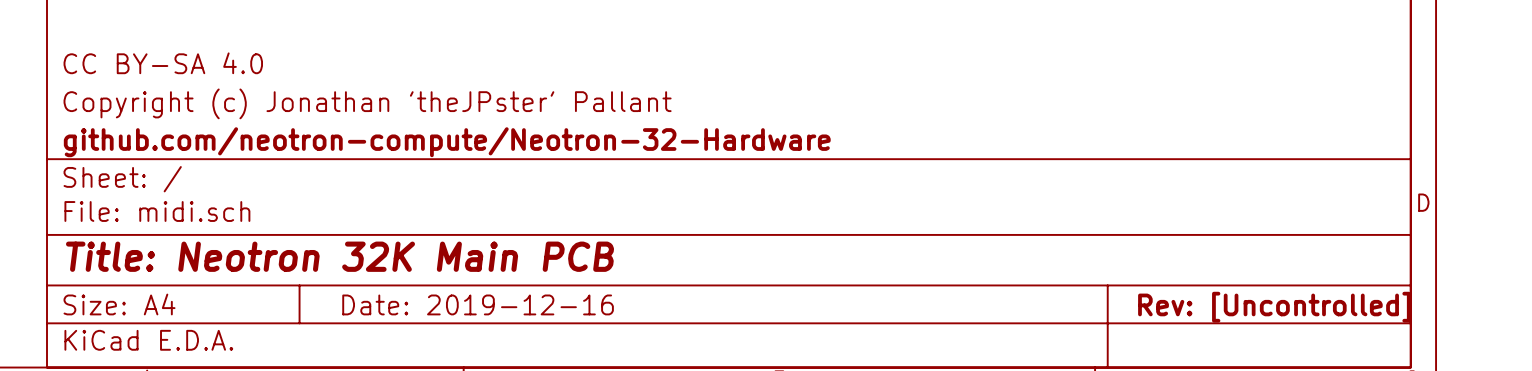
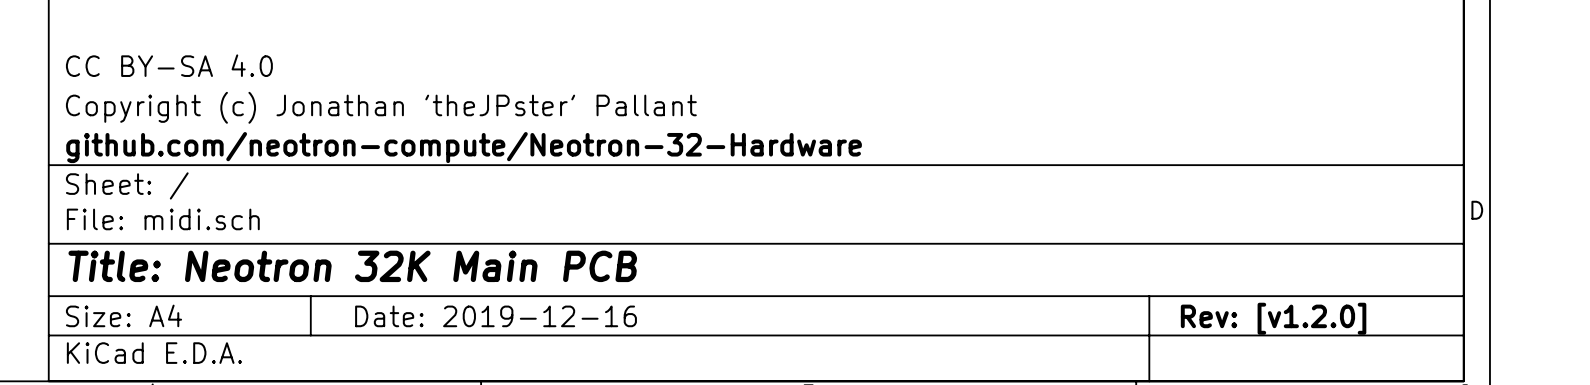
title block: Rev: [Uncontrolled] (1274, 307) -> Rev: [v1.2.0] (1273, 318)

